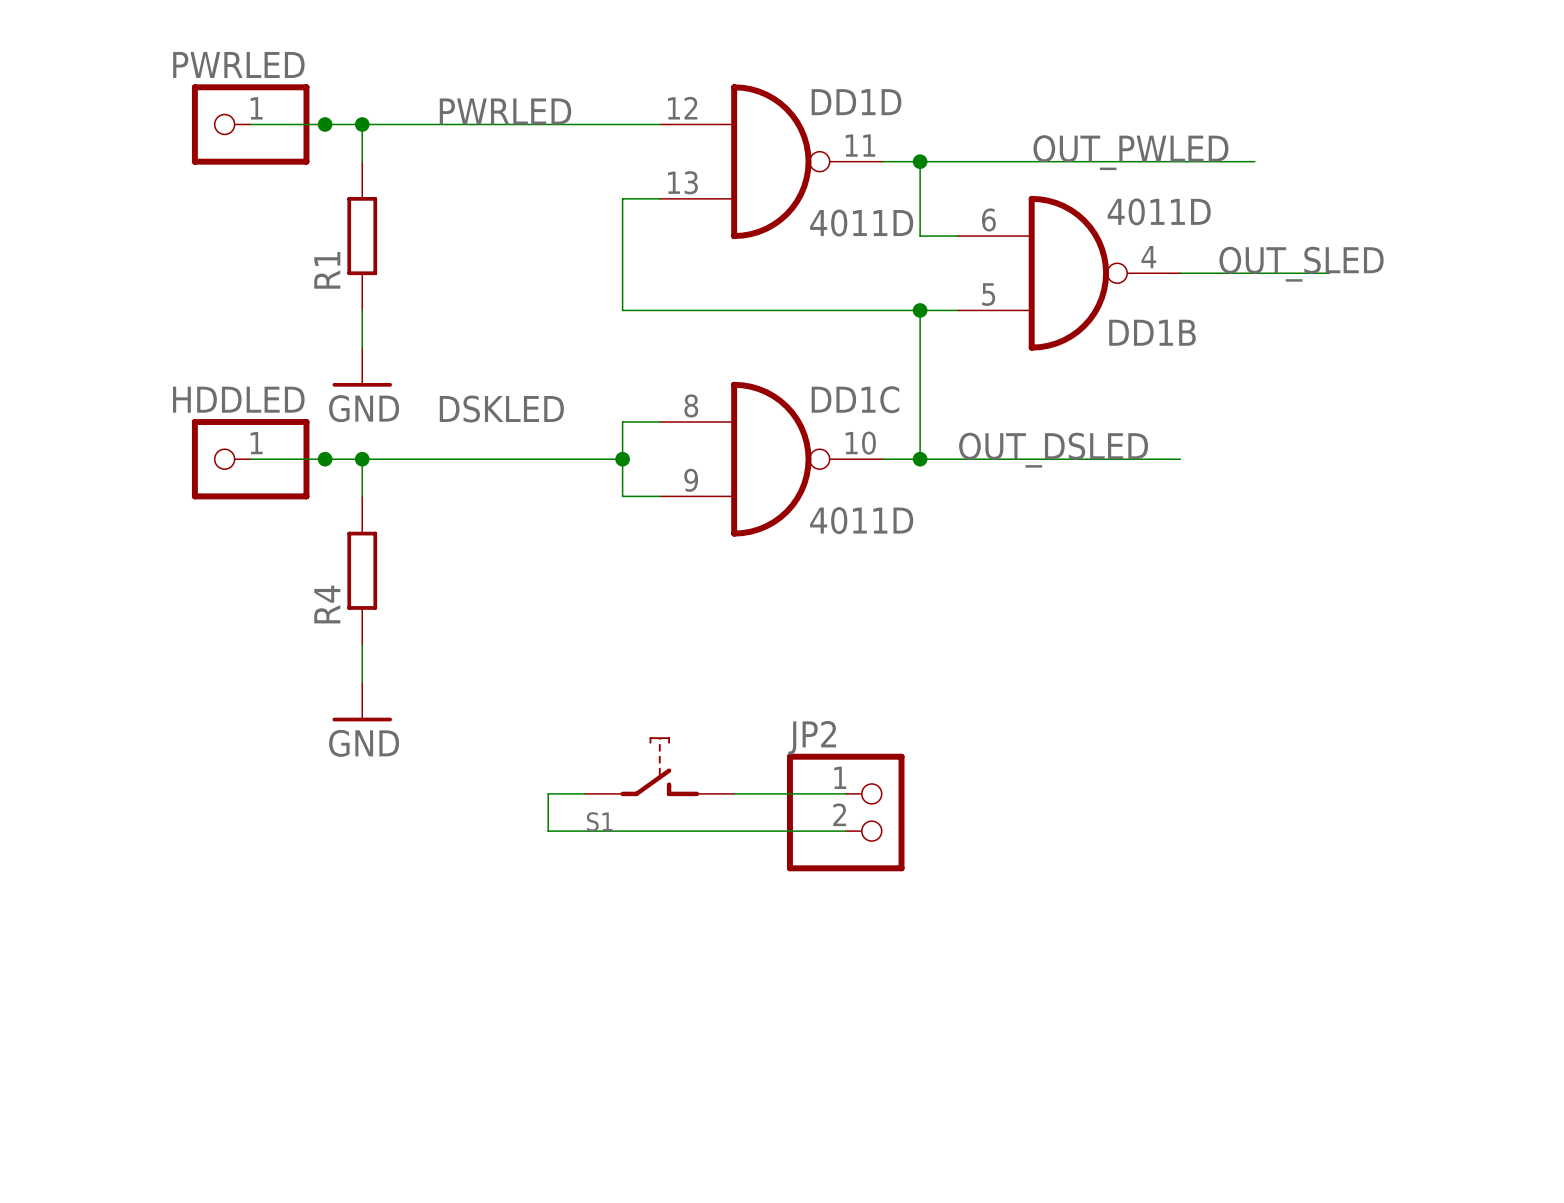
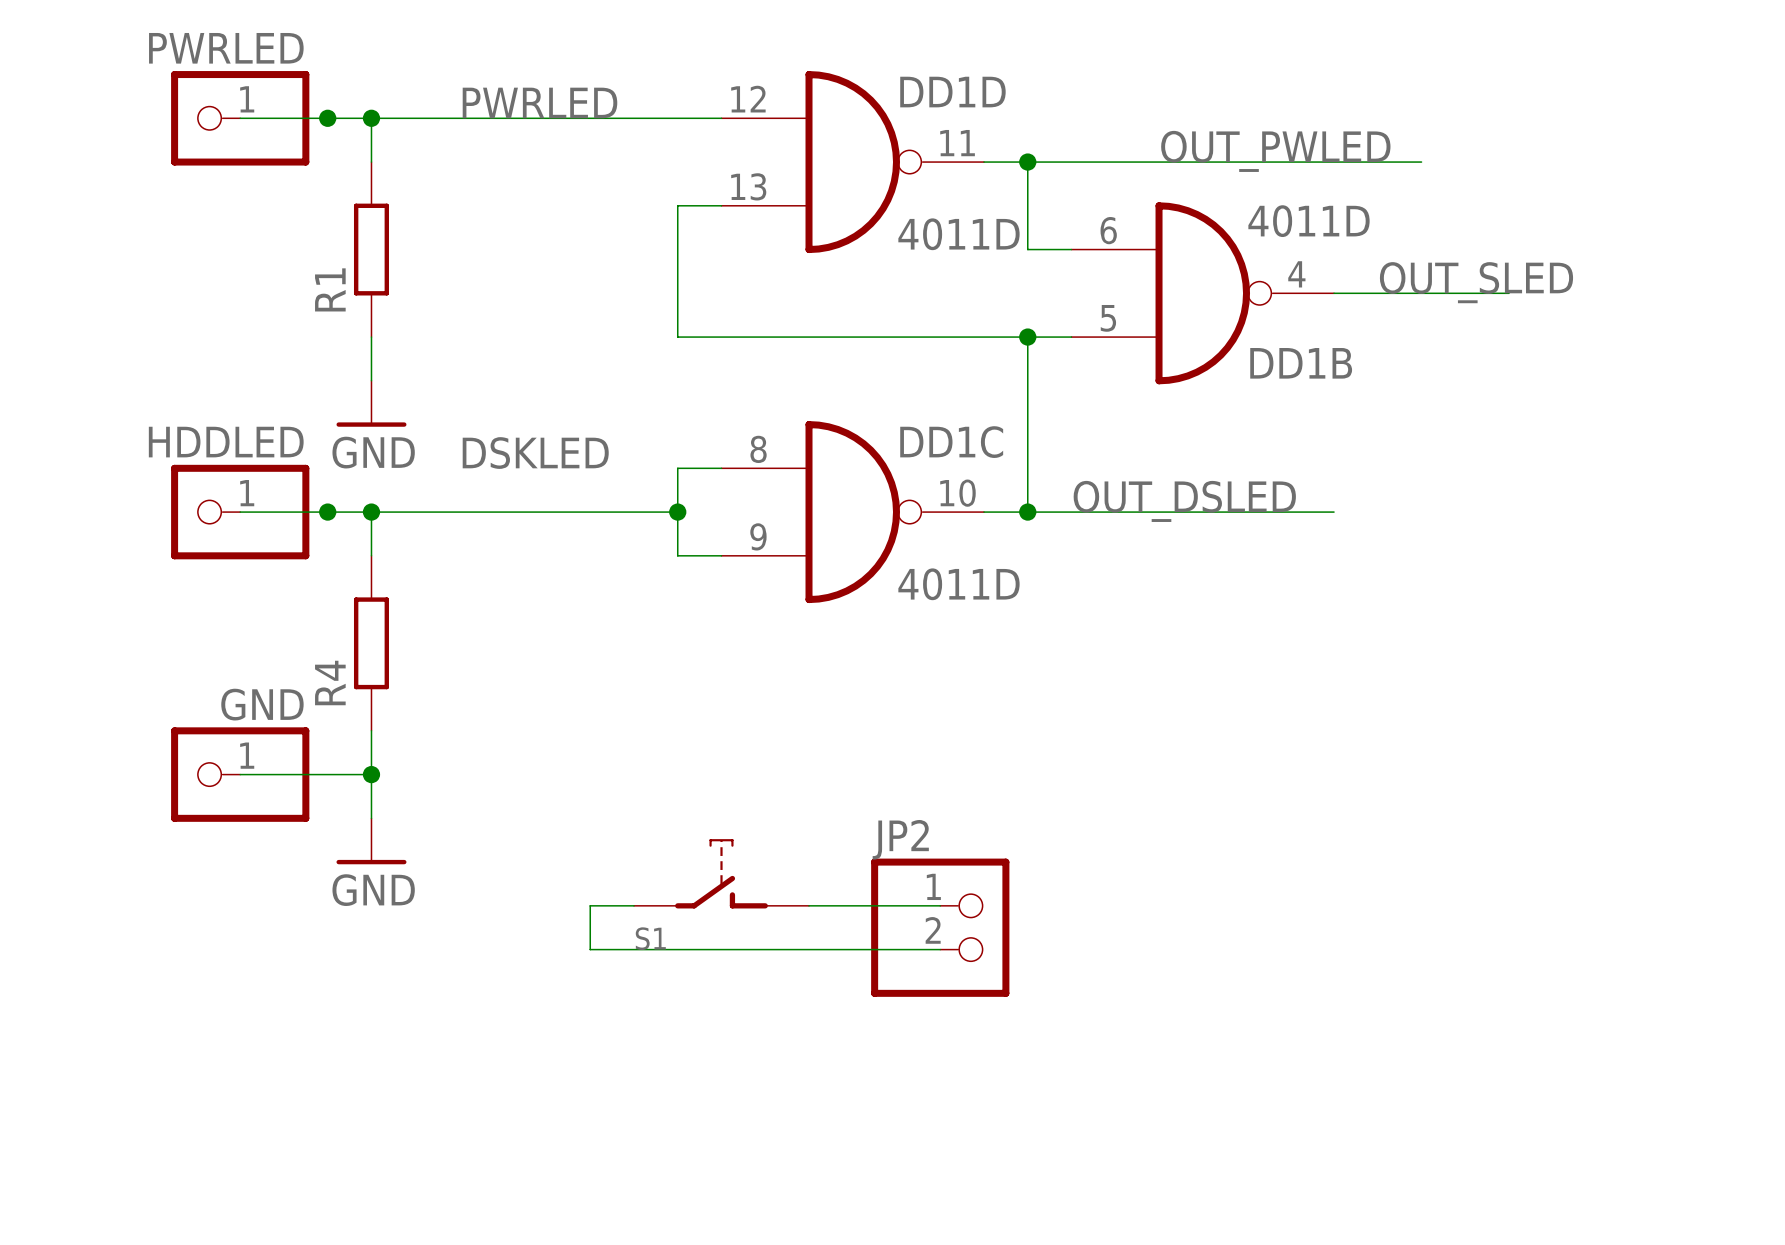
wire: none -> (240, 774) (371, 774) (371, 818)
GND: none -> (240, 774)
junction: none -> (371, 774)
power symbol position: GND (362, 701) -> GND (371, 841)

